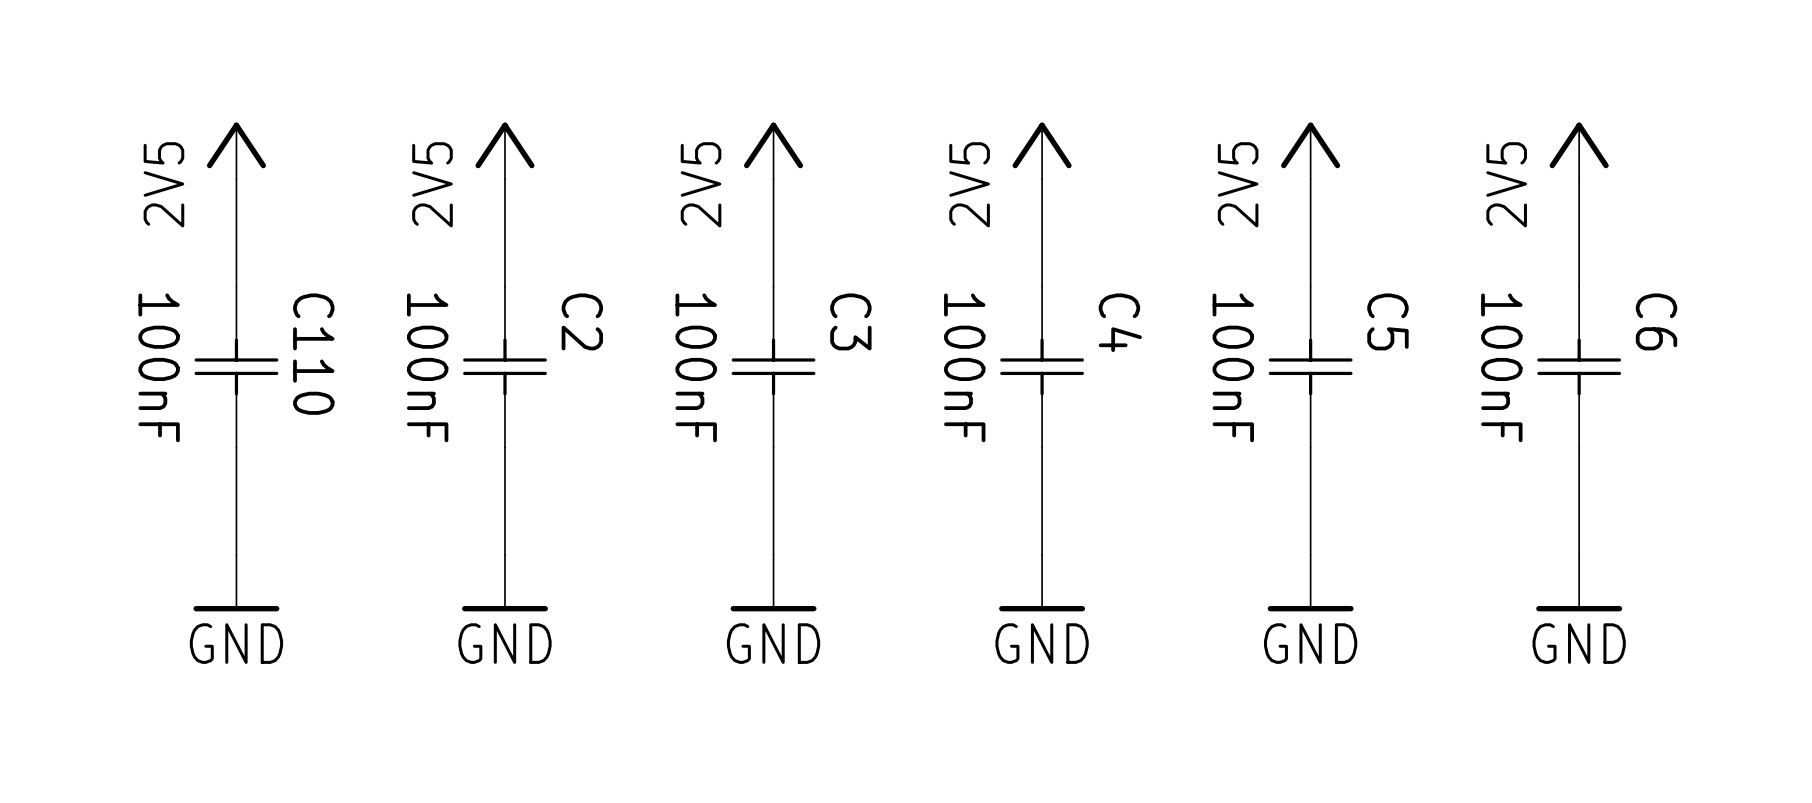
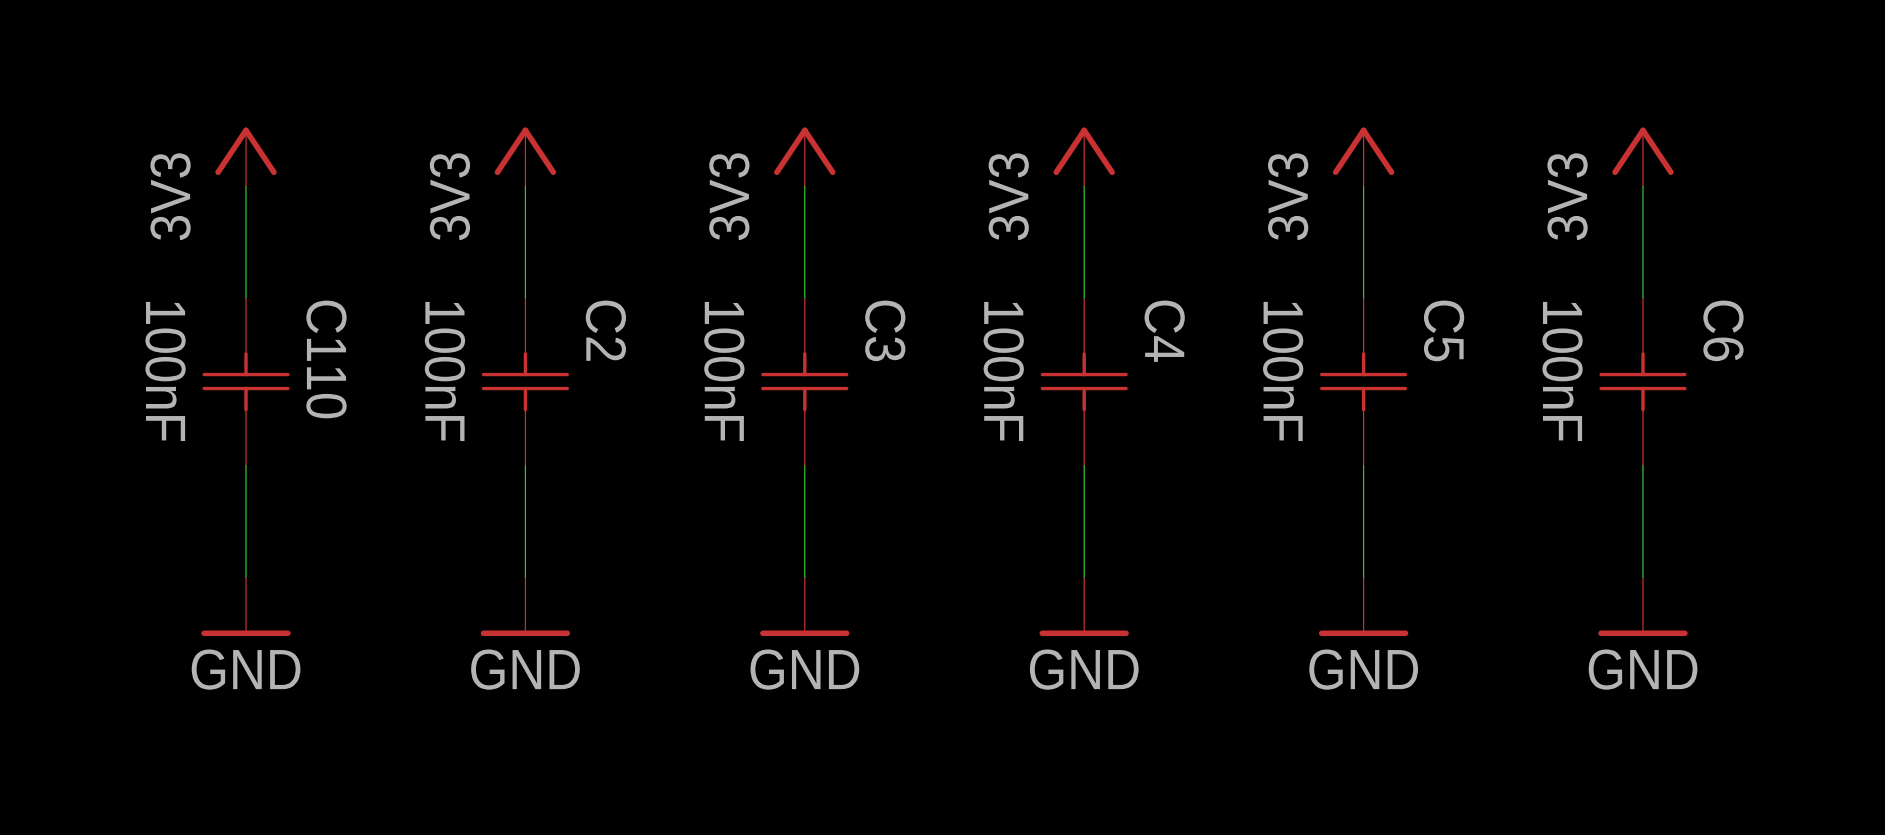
power symbol: 2V5 (236, 150) -> 3V3 (246, 156)
power symbol: 2V5 (504, 150) -> 3V3 (525, 156)
power symbol: 2V5 (773, 150) -> 3V3 (804, 156)
power symbol: 2V5 (1042, 150) -> 3V3 (1084, 156)
power symbol: 2V5 (1310, 150) -> 3V3 (1363, 156)
power symbol: 2V5 (1579, 150) -> 3V3 (1643, 156)

